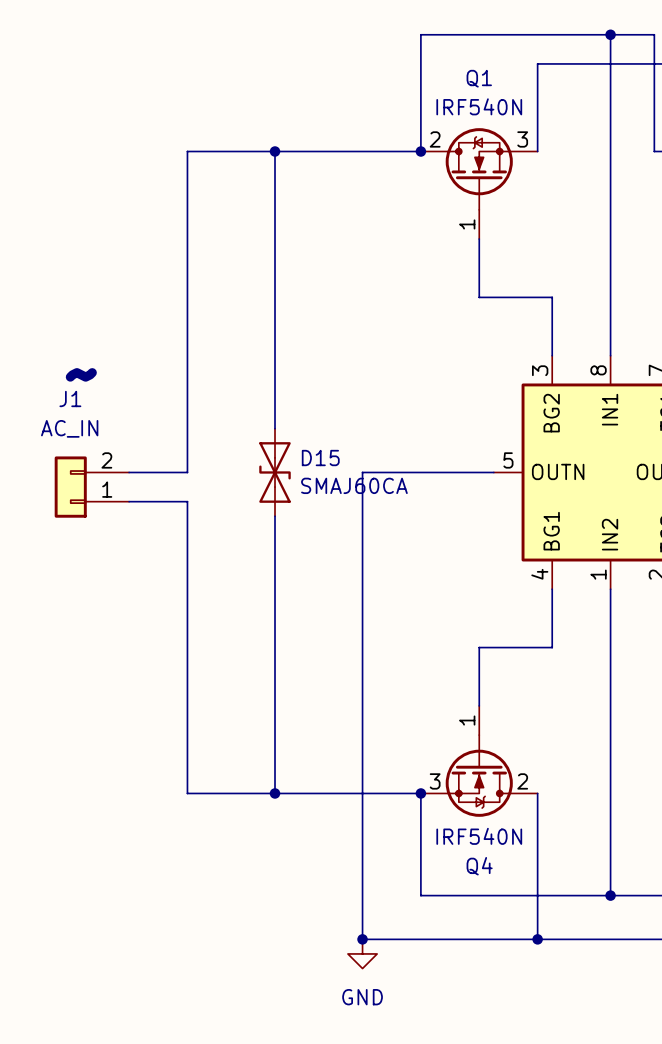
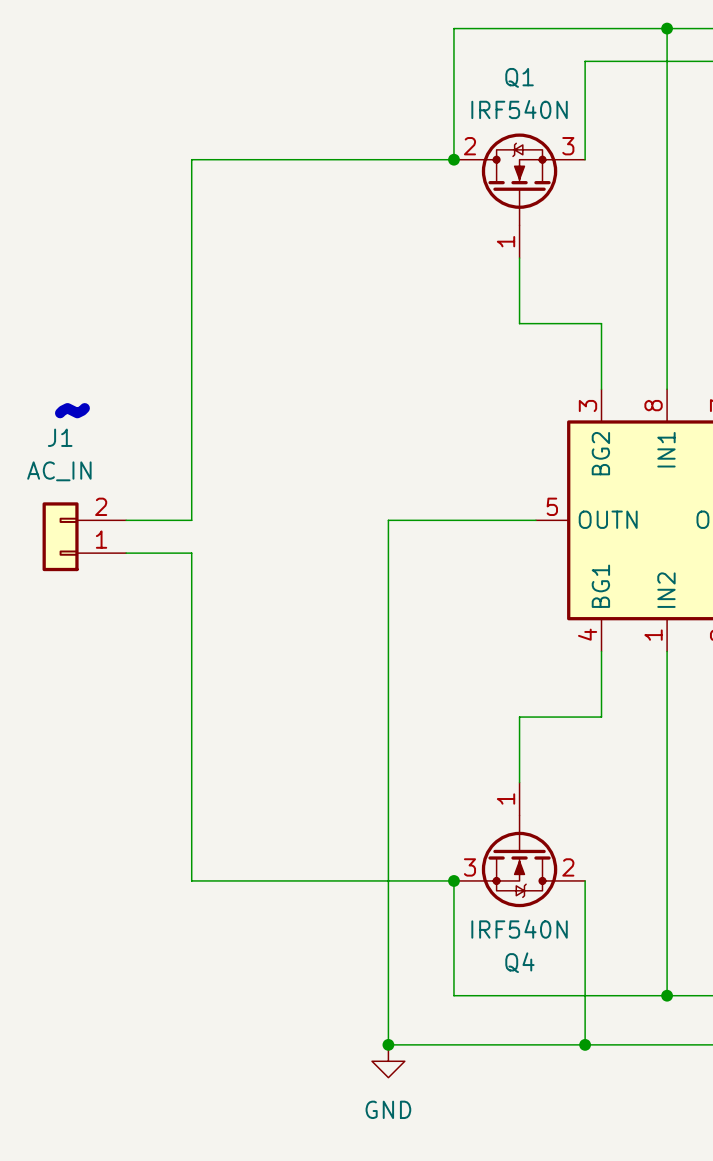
wire: (275, 151) (275, 428) -> none
junction: (275, 151) -> none
D15: SMAJ60CA (275, 472) -> none
wire: (275, 516) (275, 793) -> none
junction: (275, 793) -> none

